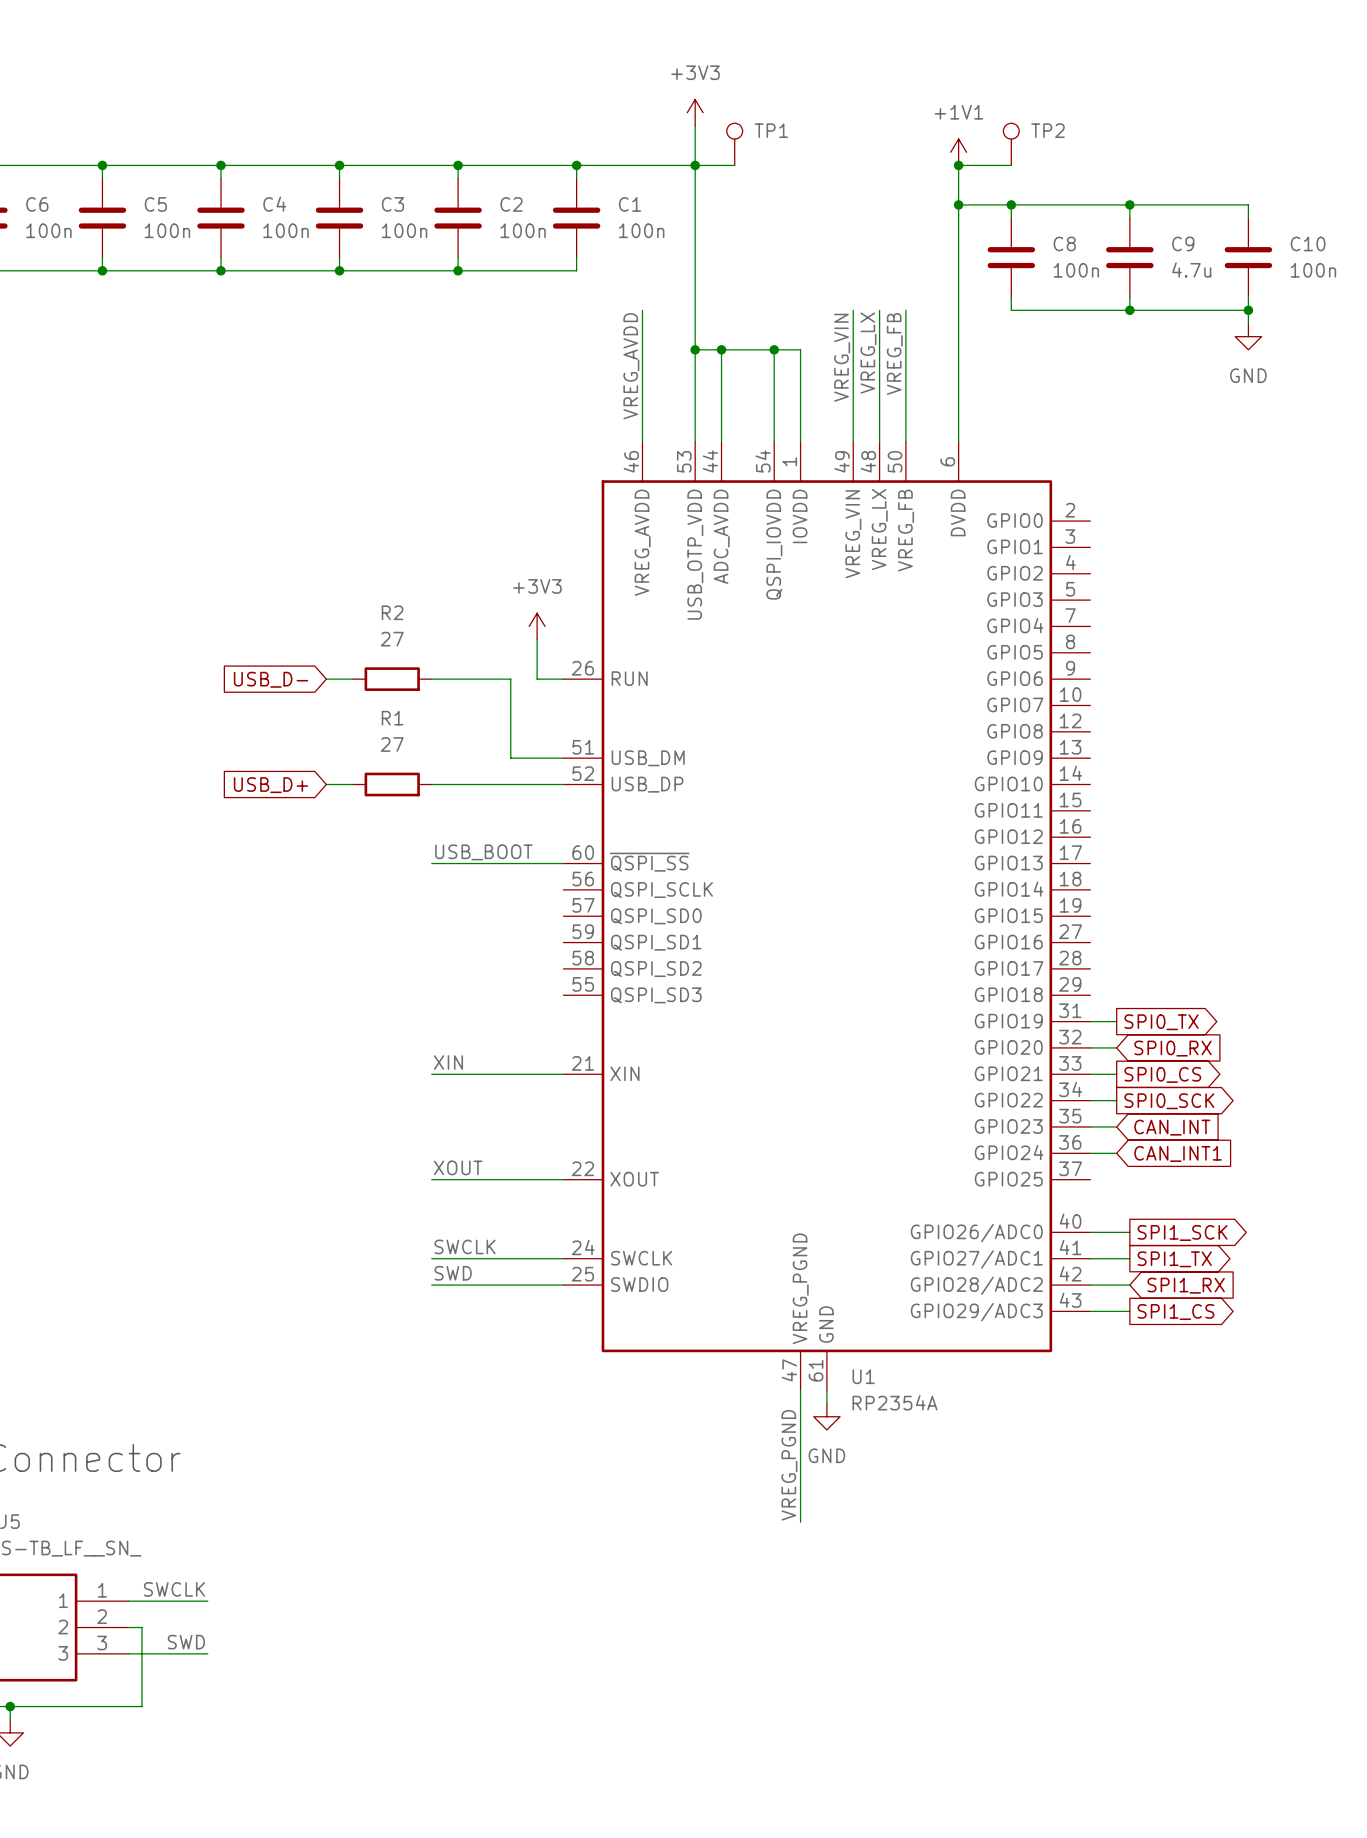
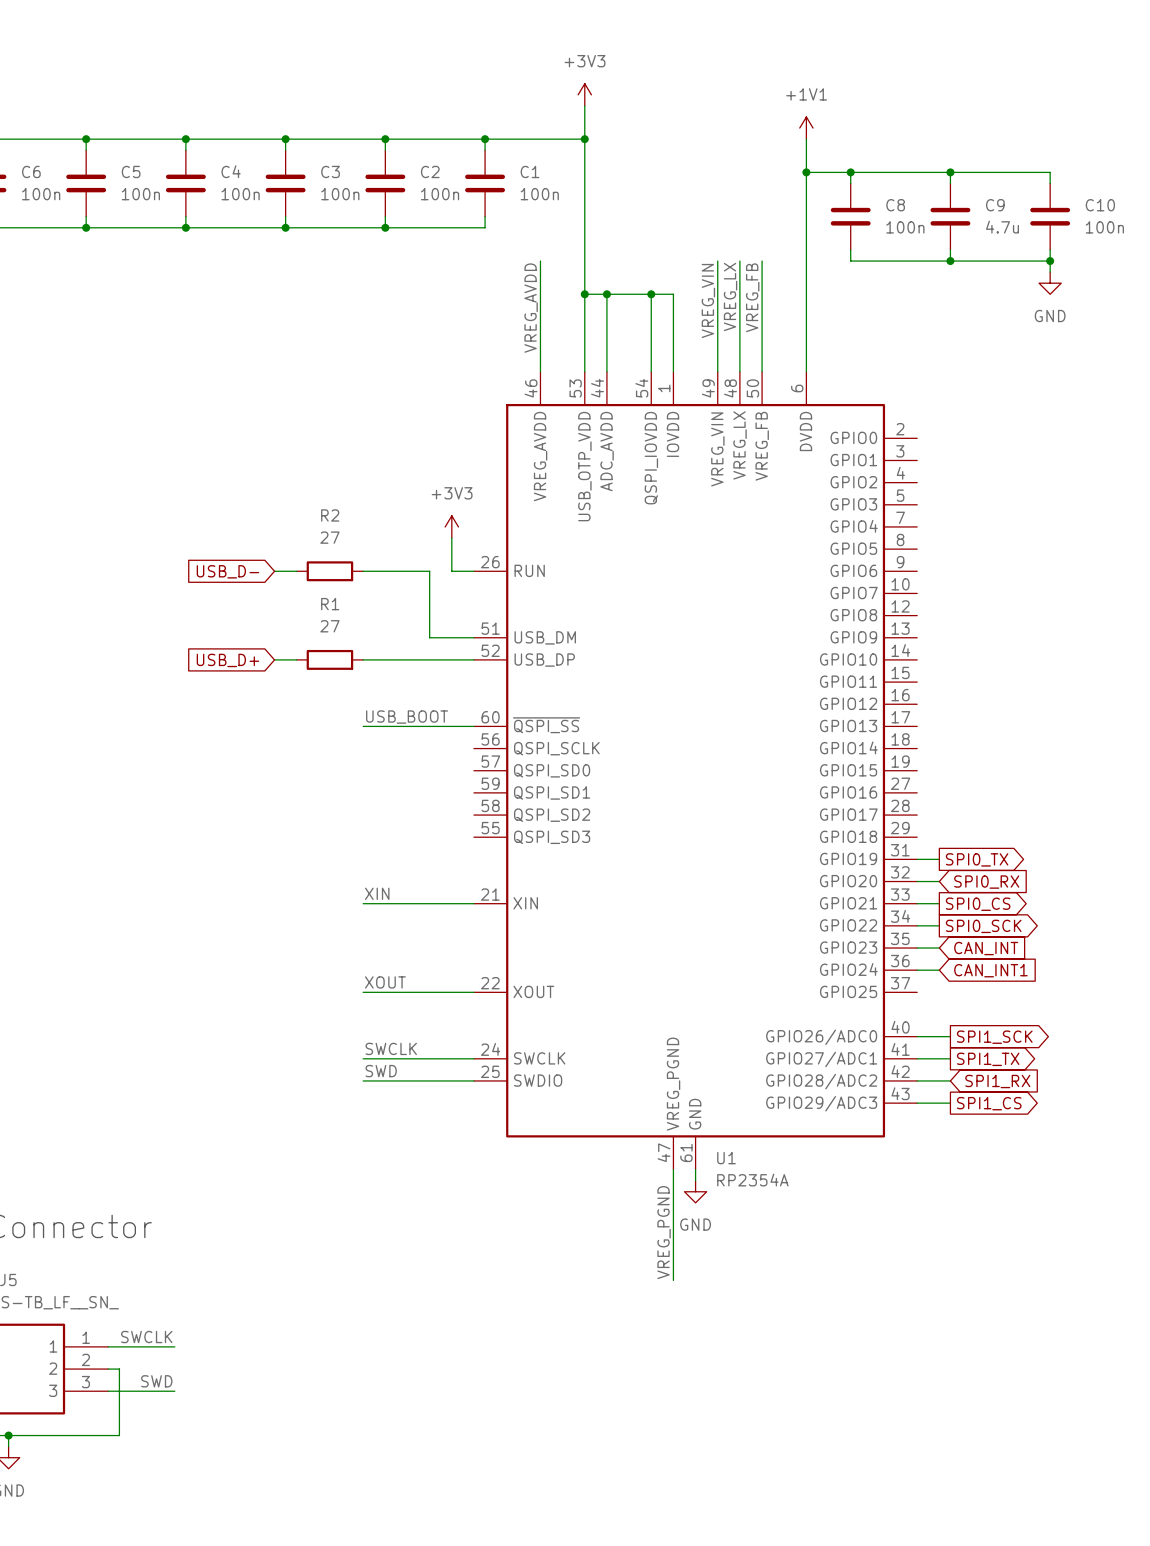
TP1: (734, 144) -> none
TP2: (1011, 144) -> none
wire: (695, 165) (734, 165) -> none
wire: (958, 165) (1011, 165) -> none
junction: (958, 165) -> none

